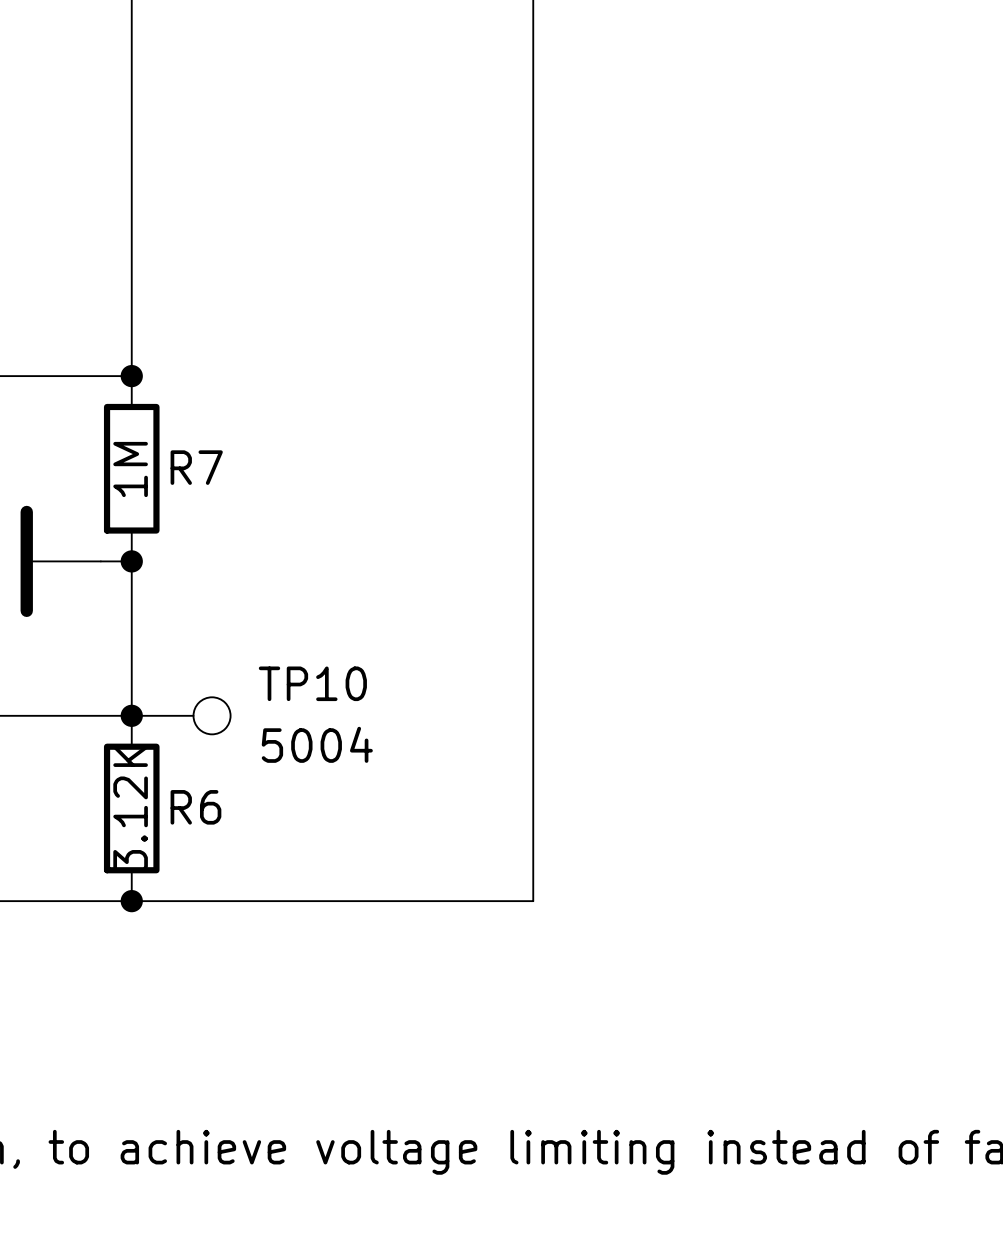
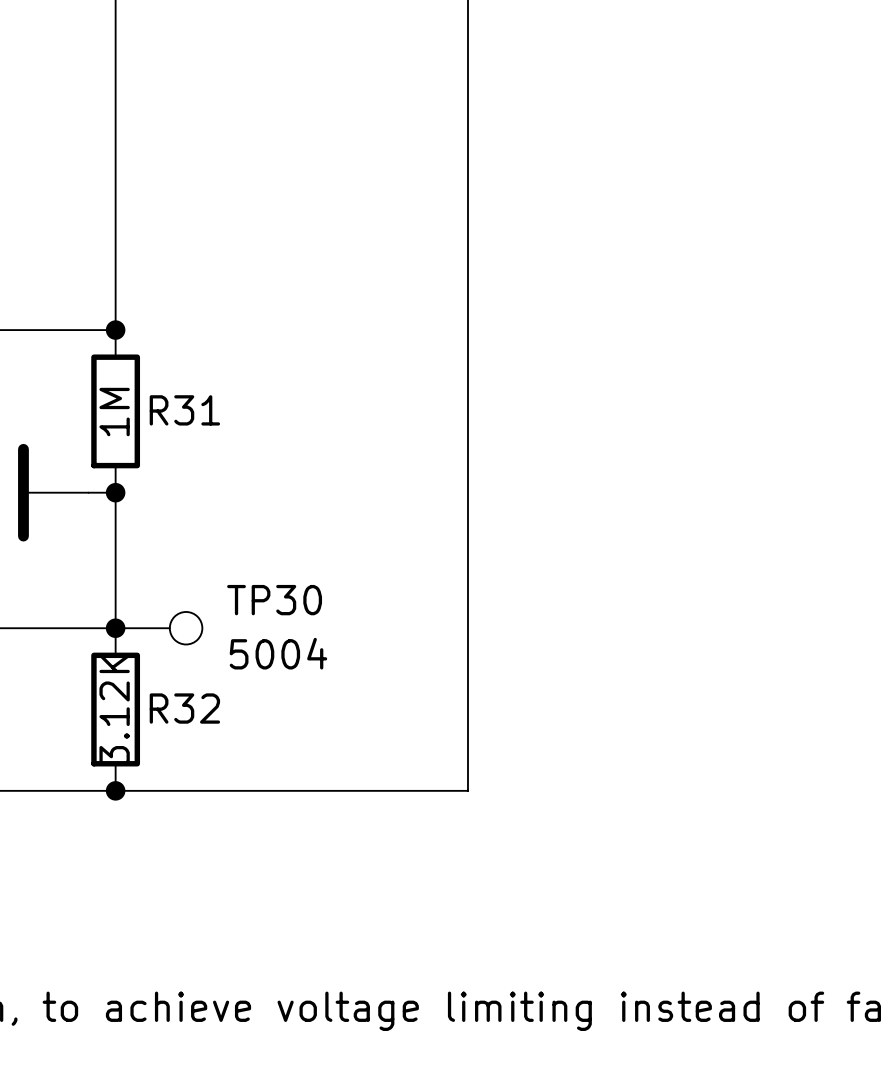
R7 name: R7 (196, 467) -> R31 (184, 410)
TP10 name: TP10 (312, 683) -> TP30 (274, 600)
R6 name: R6 (195, 807) -> R32 (184, 708)

